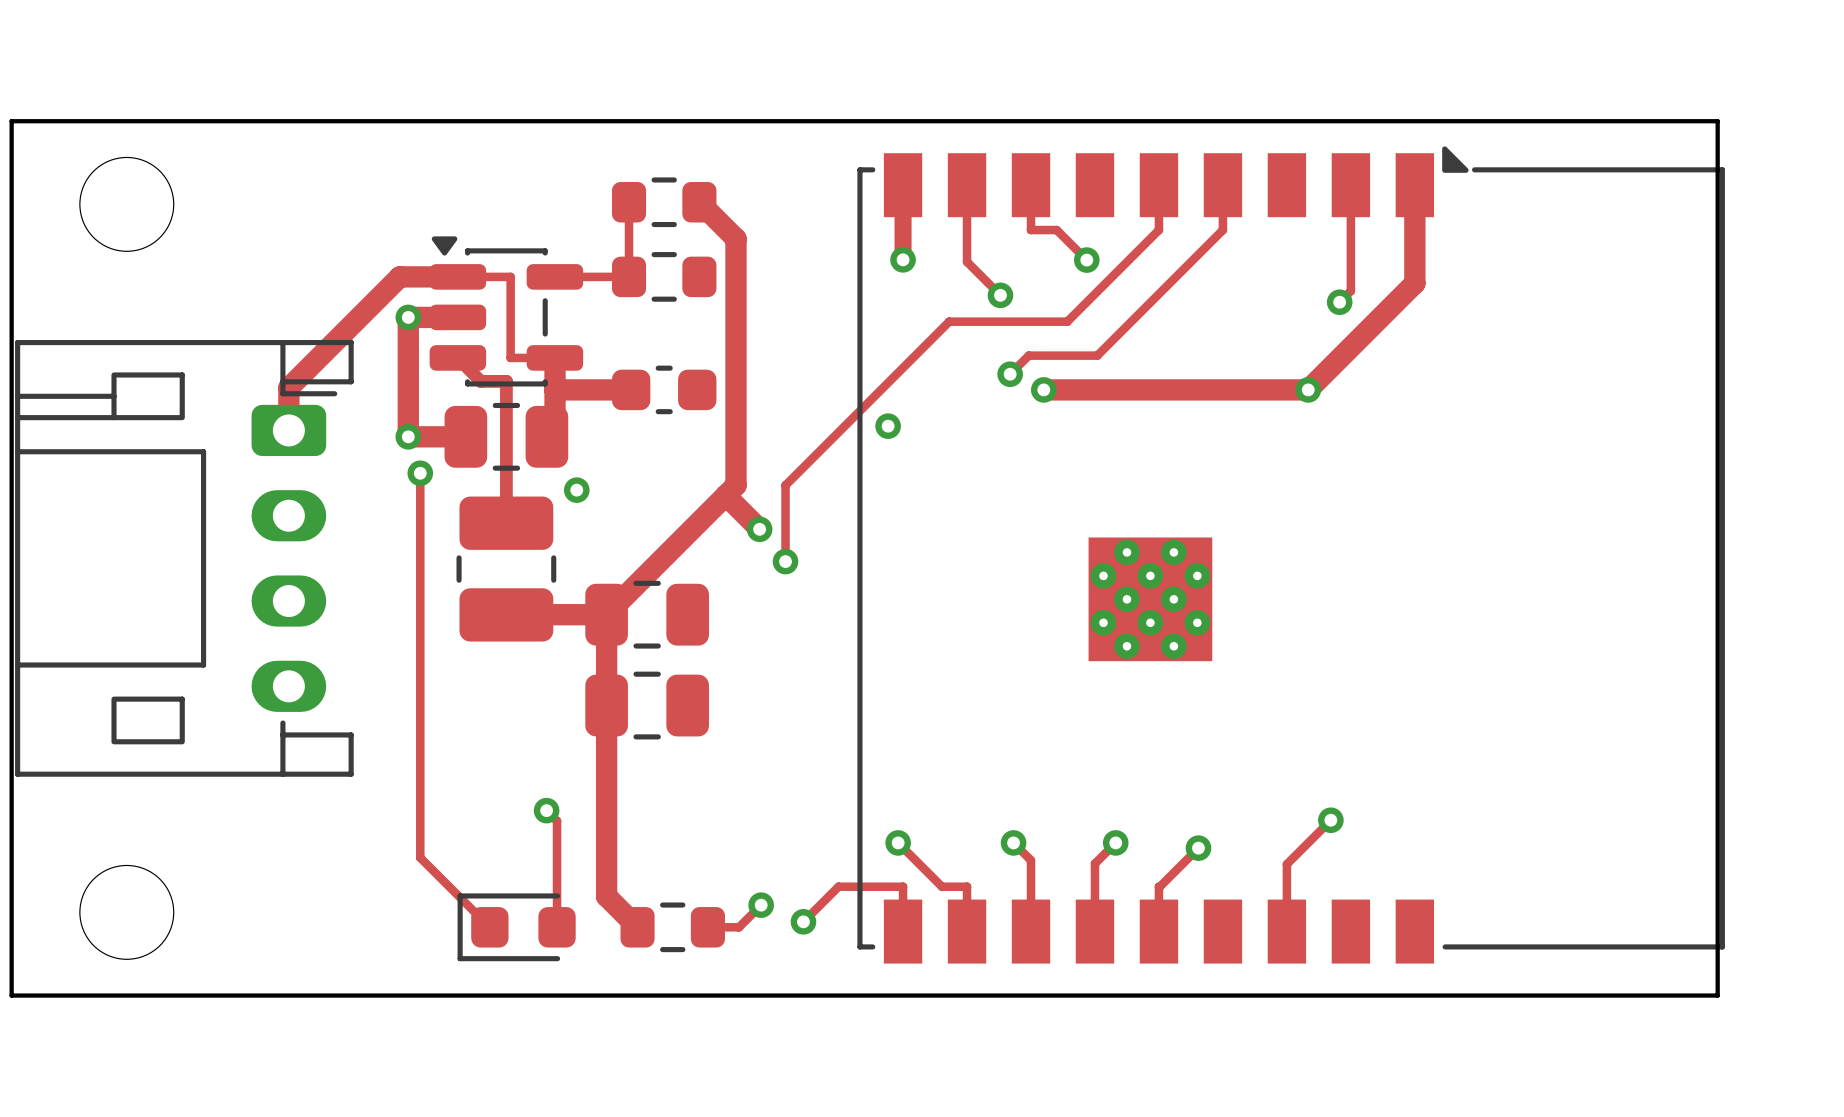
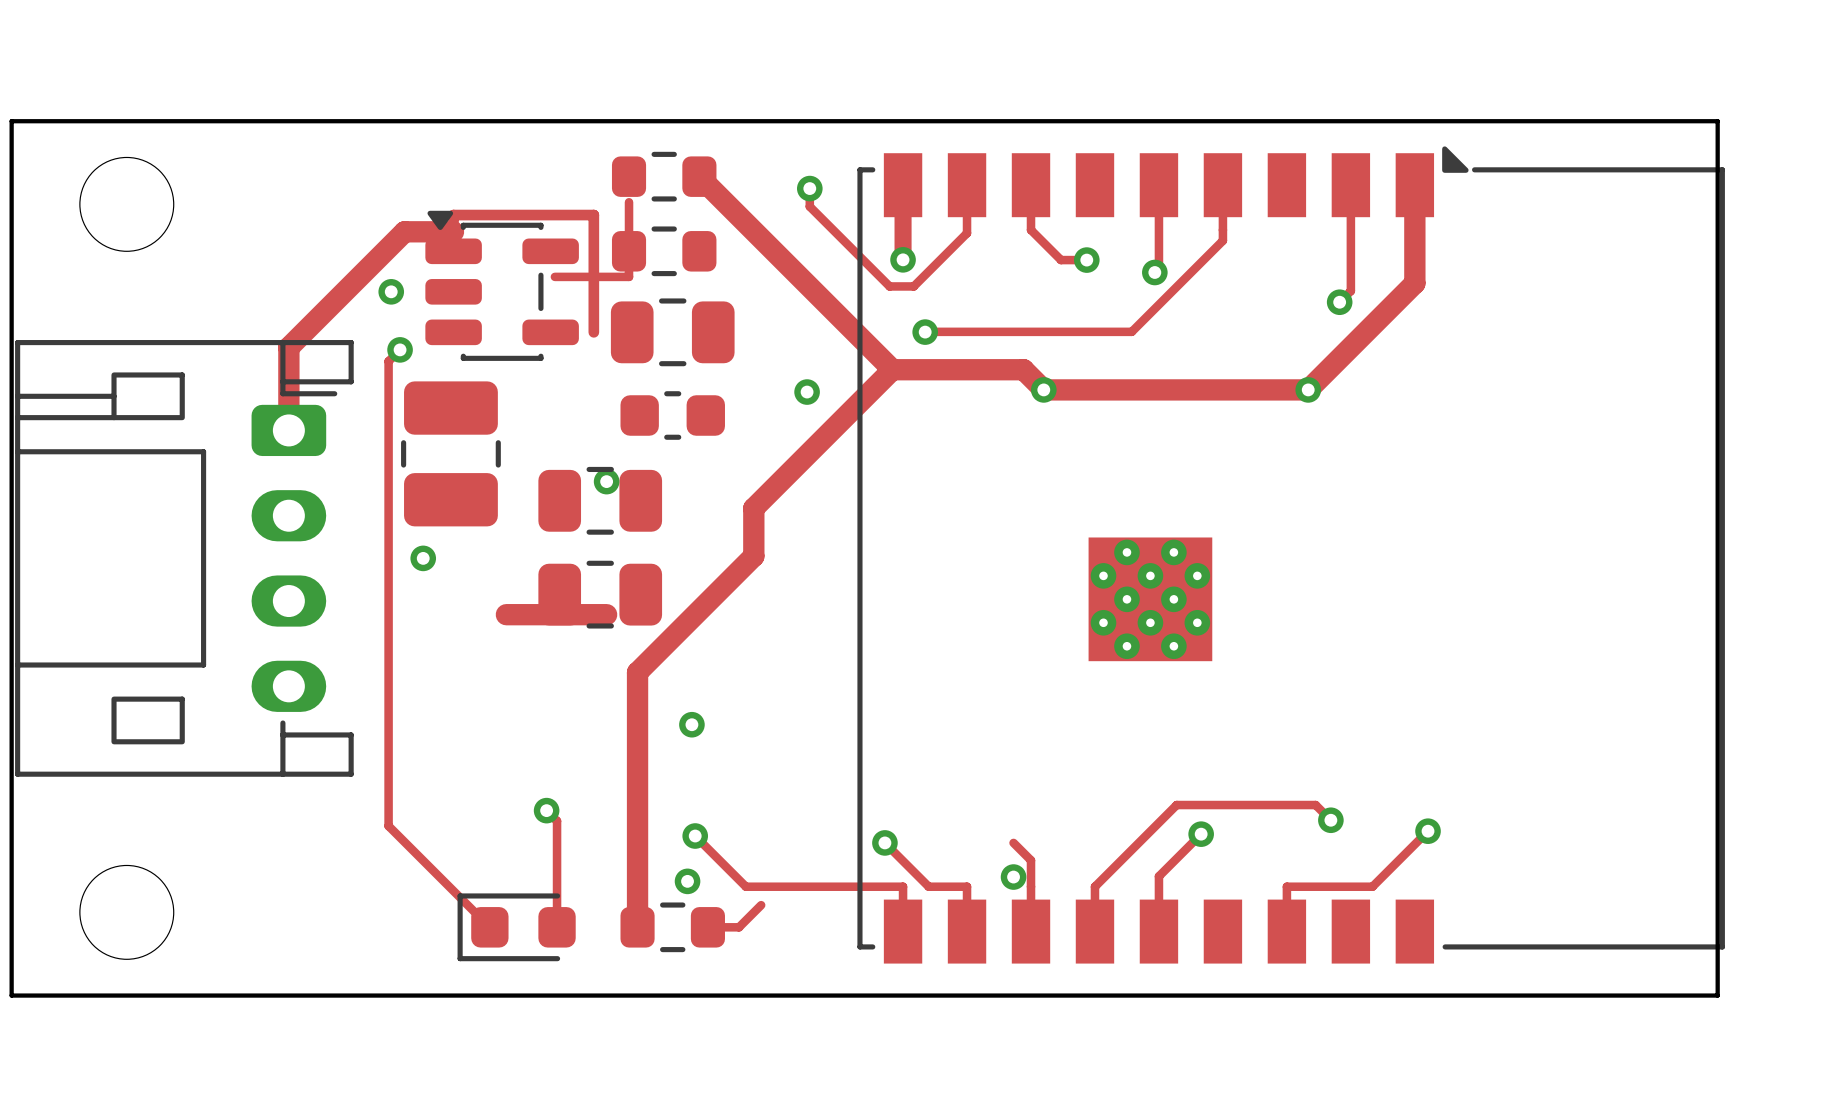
part: none -> (664, 176)
track: none -> (699, 176) (892, 369)
via: none -> (809, 188)
part: (664, 202) -> none
track: (699, 202) (735, 238) (735, 485) (606, 614) (606, 896) (637, 927) -> (892, 369) (753, 508) (753, 556) (637, 672) (637, 927)
track: (1031, 230) (1056, 230) (1086, 260) -> (1031, 230) (1061, 260) (1086, 260)
track: (1158, 230) (1067, 321) (949, 321) (785, 485) (785, 561) -> (1158, 230) (1158, 268) (1154, 272)
track: (1222, 230) (1097, 355) (1028, 355) (1010, 374) -> (1222, 230) (1222, 240) (1131, 331) (924, 331)
track: (967, 233) (967, 261) (1000, 295) -> (967, 233) (913, 286) (889, 286) (809, 206) (809, 188)
track: none -> (453, 251) (453, 215) (593, 215) (593, 332)
part: none -> (664, 251)
via: none -> (1154, 272)
part: (664, 276) -> none
via: (1000, 295) -> none
part position: (506, 311) -> (502, 285)
via position: (408, 317) -> (391, 291)
track: (457, 317) (408, 317) (408, 436) (465, 436) -> none
part: none -> (672, 332)
via: none -> (925, 332)
via: none -> (400, 349)
track: (457, 357) (480, 381) (506, 381) (506, 523) -> none
track: none -> (892, 369) (1023, 369) (1043, 389)
via: (1010, 374) -> none
track: (288, 387) (399, 276) (510, 276) (510, 357) (555, 357) (555, 428) (546, 436) -> (288, 387) (288, 347) (404, 231) (453, 231)
track: (555, 389) (631, 389) -> none
part position: (664, 389) -> (672, 415)
via: none -> (807, 392)
via: (888, 426) -> none
via: (408, 436) -> none
part: (506, 436) -> none
track: (420, 473) (420, 857) -> (400, 349) (388, 361) (388, 826) (420, 857)
via: (420, 473) -> none
via position: (576, 490) -> (606, 481)
track: (725, 495) (759, 529) -> none
part: none -> (600, 500)
via: (759, 529) -> none
via: none -> (423, 558)
via: (785, 561) -> none
part position: (506, 569) -> (450, 453)
part position: (647, 614) -> (600, 594)
part: (647, 705) -> none
via: none -> (691, 724)
track: (1330, 820) (1286, 864) (1286, 886) -> (1428, 831) (1372, 886) (1286, 886)
via: none -> (1428, 831)
via: none -> (695, 836)
track: (898, 842) (941, 886) -> (884, 842) (928, 886) (941, 886)
via position: (898, 842) -> (884, 842)
via position: (1013, 842) -> (1013, 877)
track: (1115, 842) (1094, 863) (1094, 886) -> (1330, 820) (1315, 805) (1176, 805) (1094, 886)
via: (1115, 842) -> none
track: (1198, 848) (1158, 886) -> (1201, 834) (1158, 876) (1158, 886)
via position: (1198, 848) -> (1201, 834)
via: none -> (687, 881)
track: (838, 886) (803, 921) -> (838, 886) (745, 886) (695, 836)
via: (761, 905) -> none
via: (803, 921) -> none

